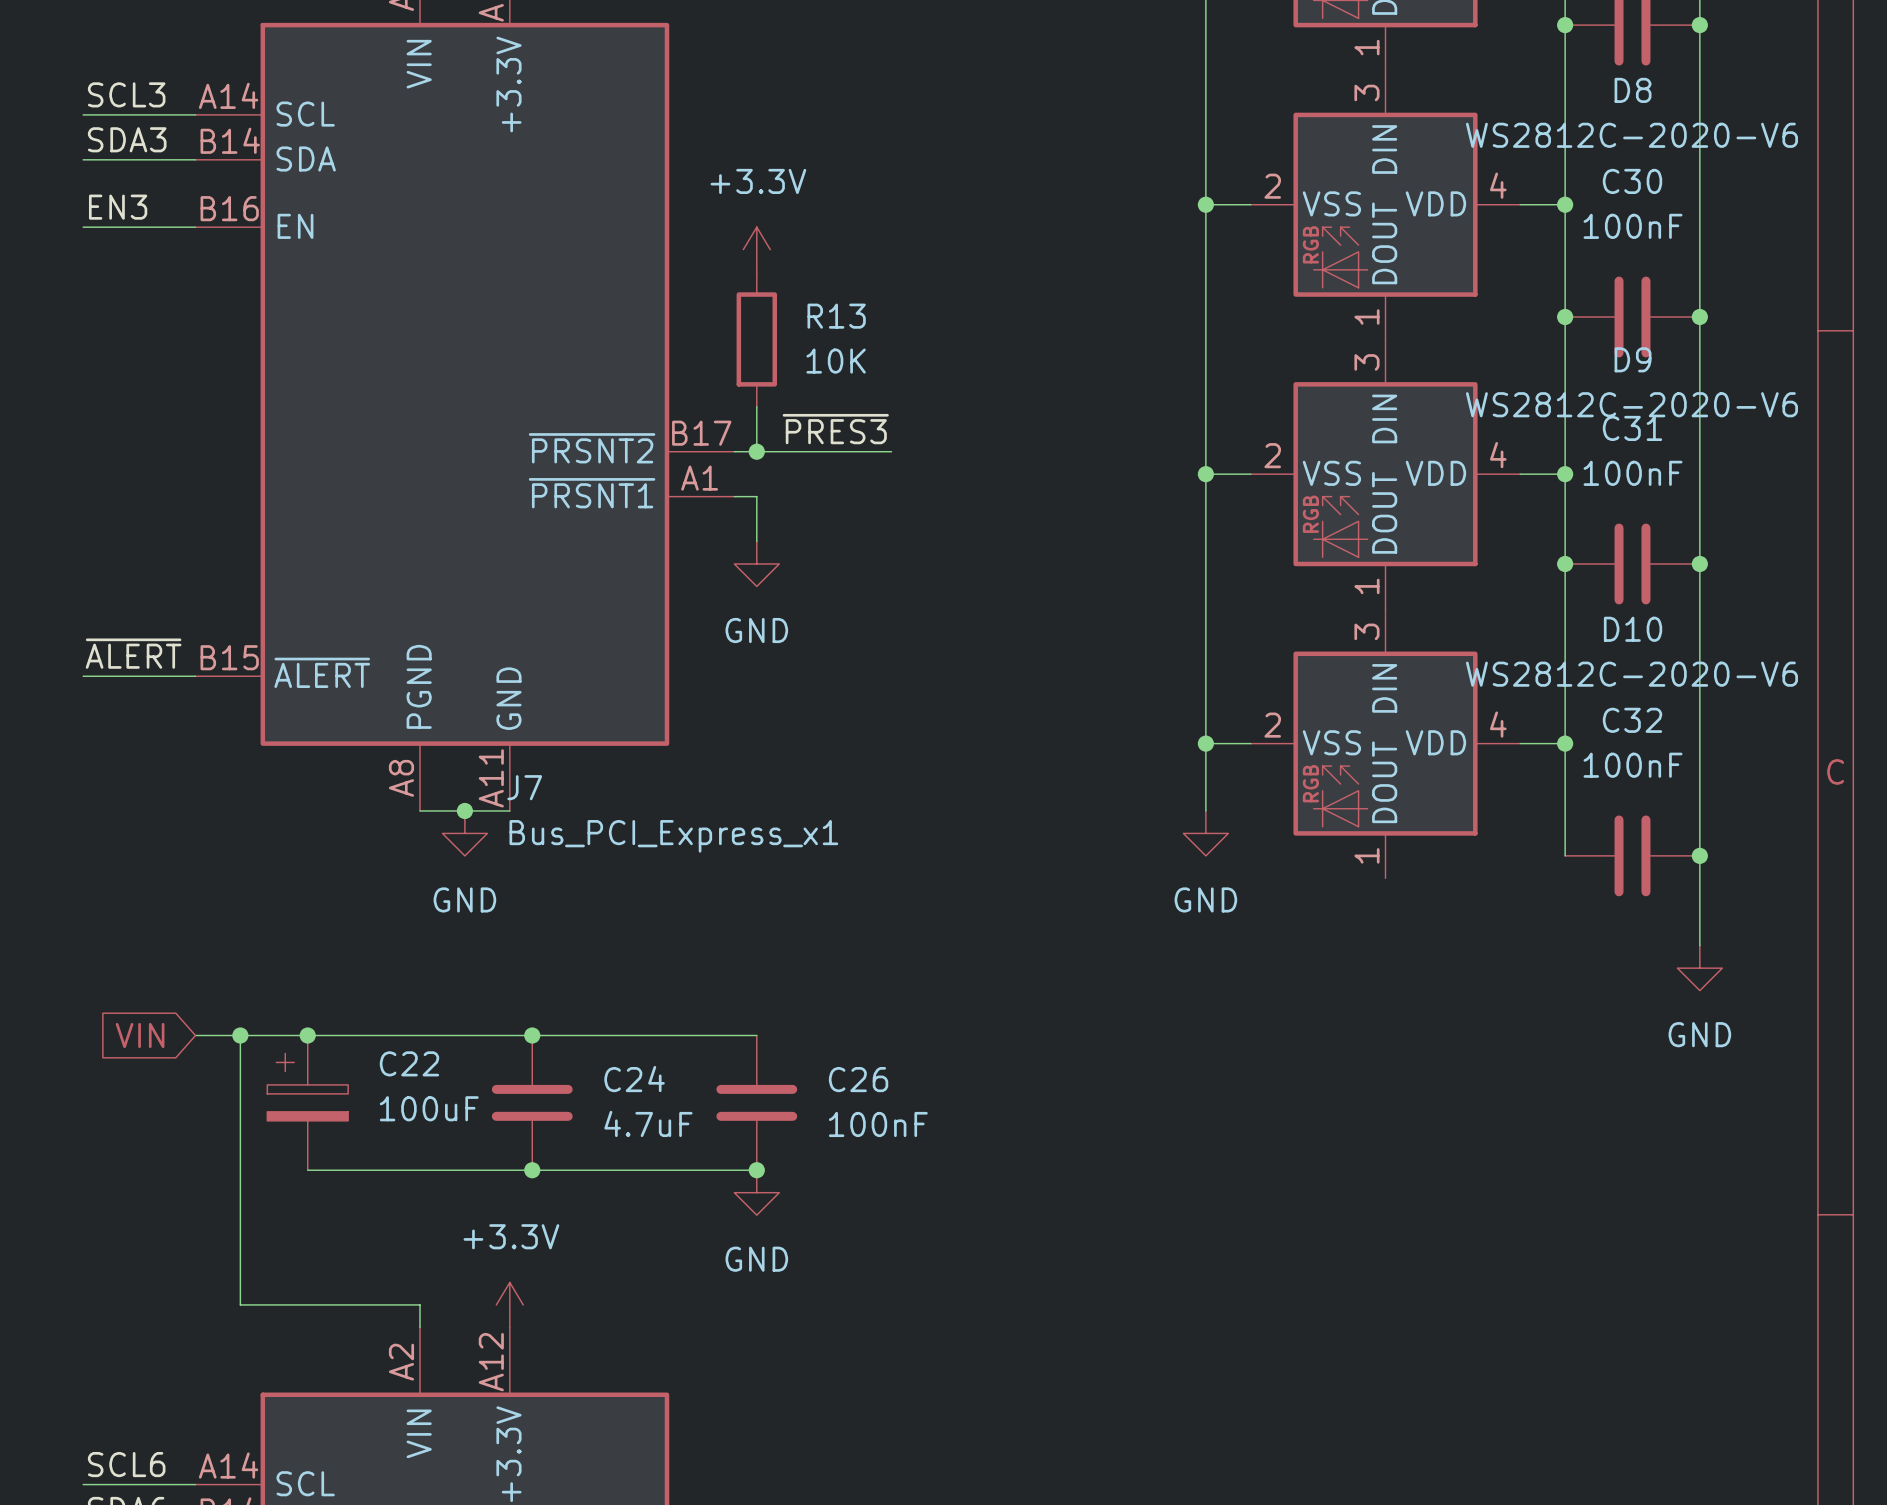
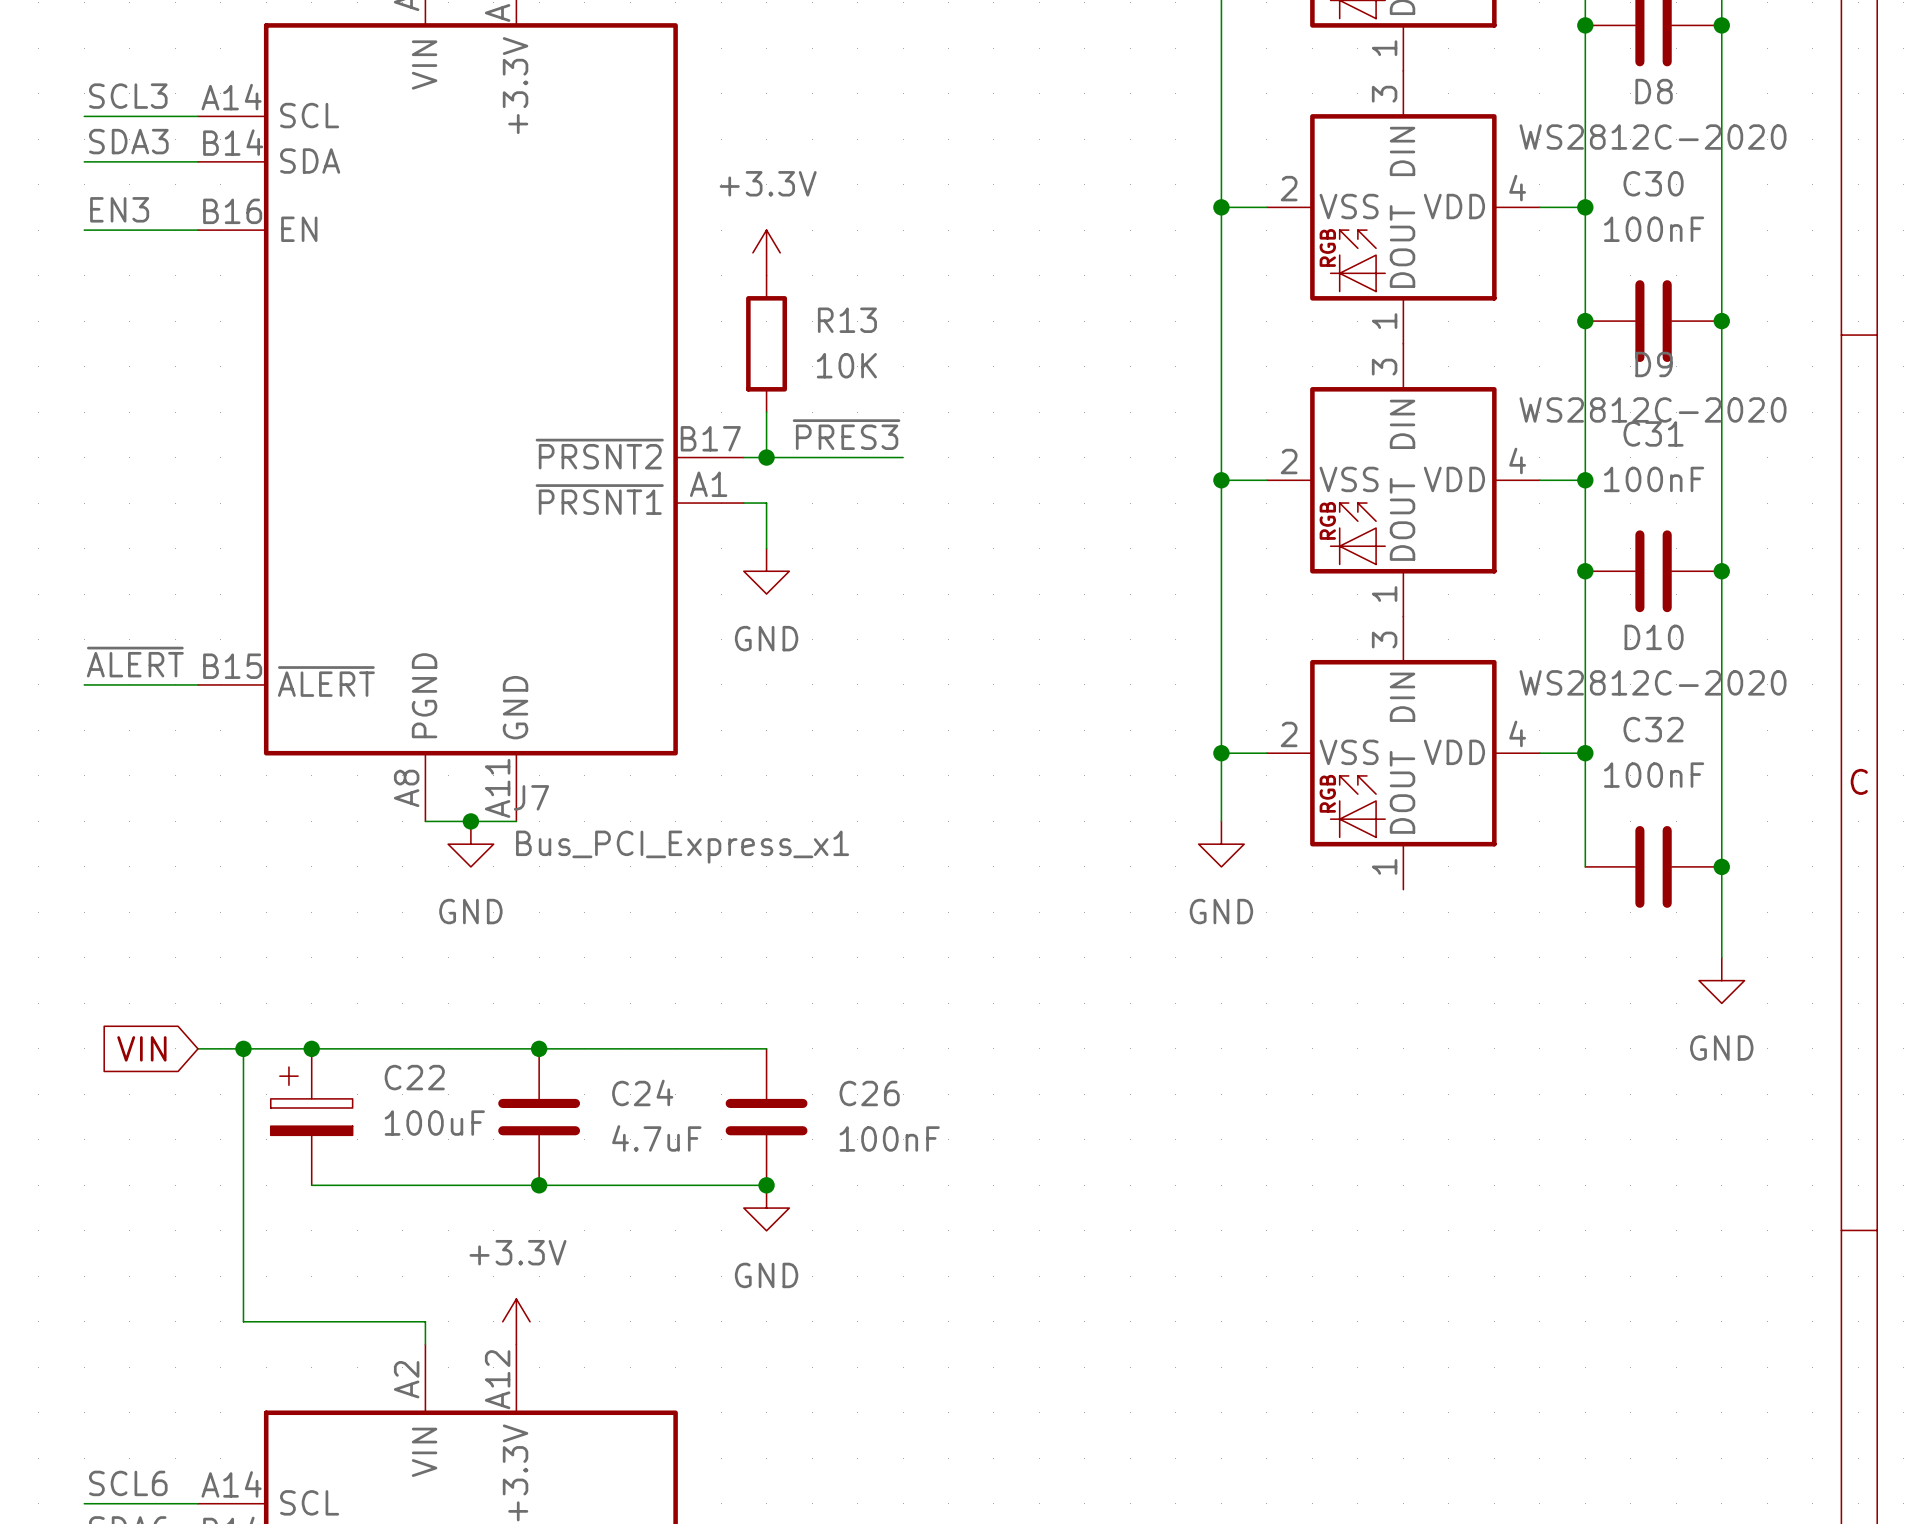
D8 value: WS2812C-2020-V6 (1631, 135) -> WS2812C-2020 (1653, 137)
D9 value: WS2812C-2020-V6 (1631, 404) -> WS2812C-2020 (1653, 409)
D10 value: WS2812C-2020-V6 (1631, 674) -> WS2812C-2020 (1653, 682)

